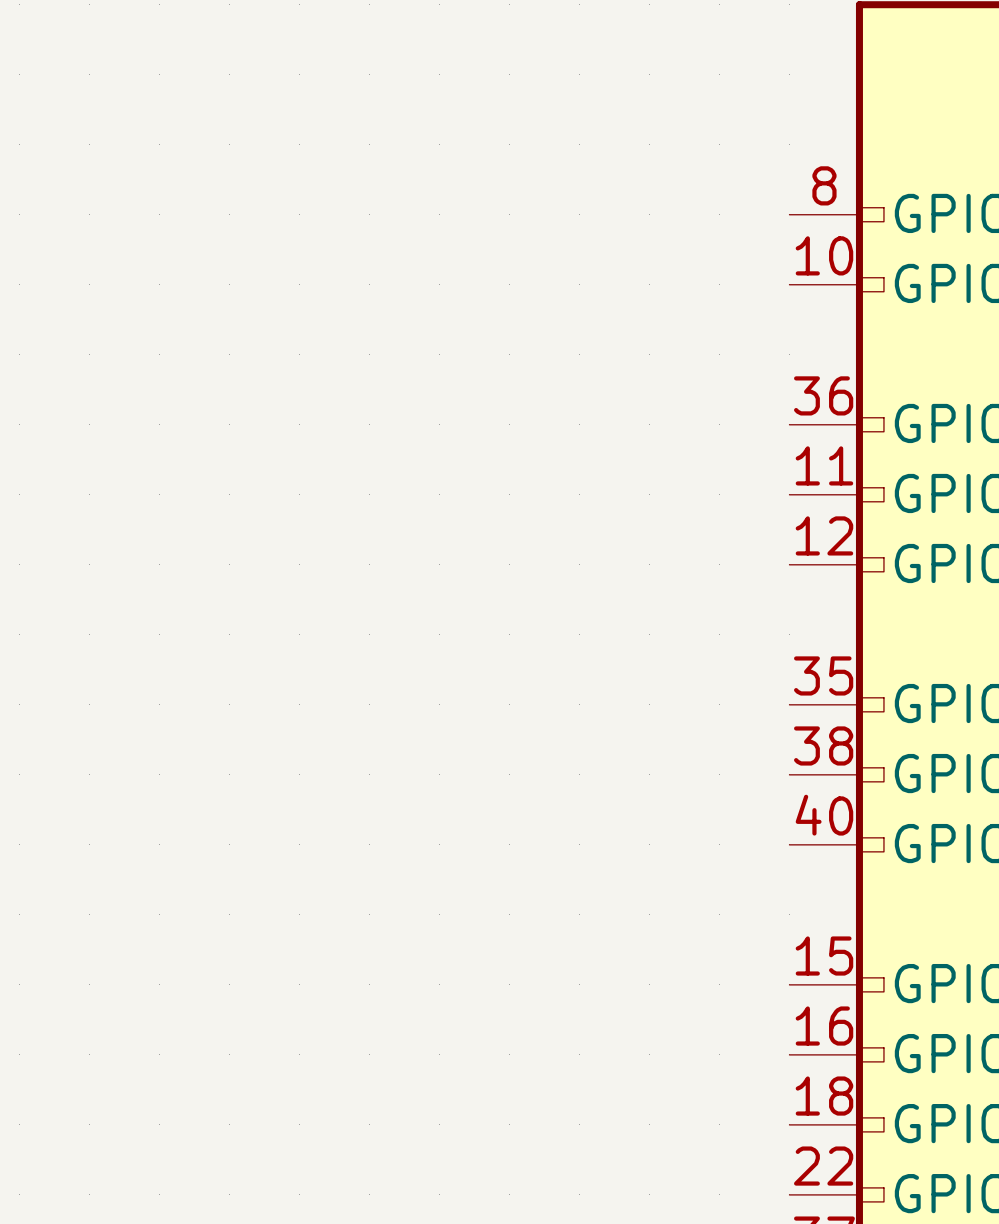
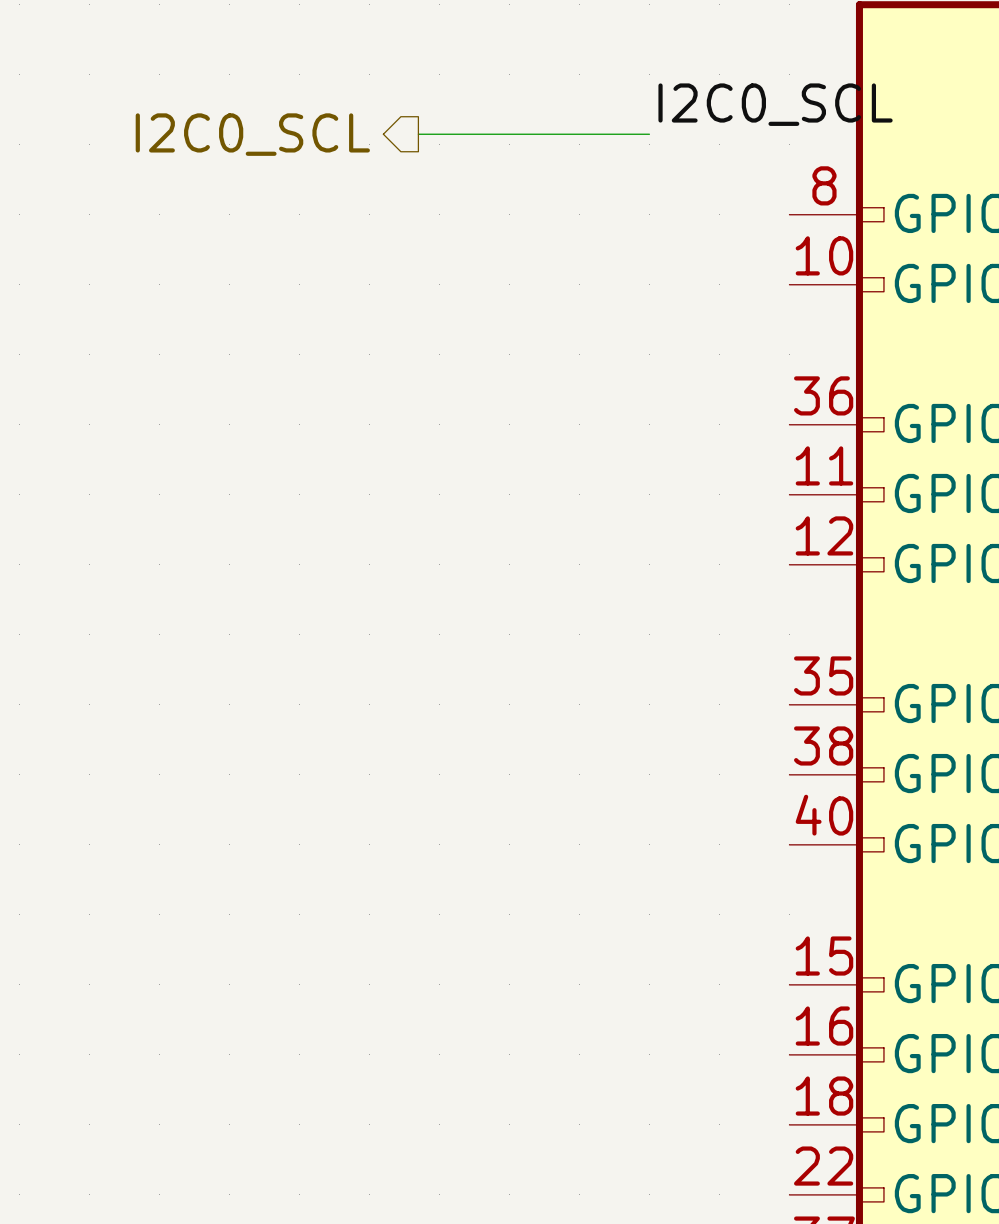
label: none -> I2C0_SCL (775, 104)
hierarchical label: none -> I2C0_SCL (252, 134)
wire: none -> (418, 134) (649, 134)

